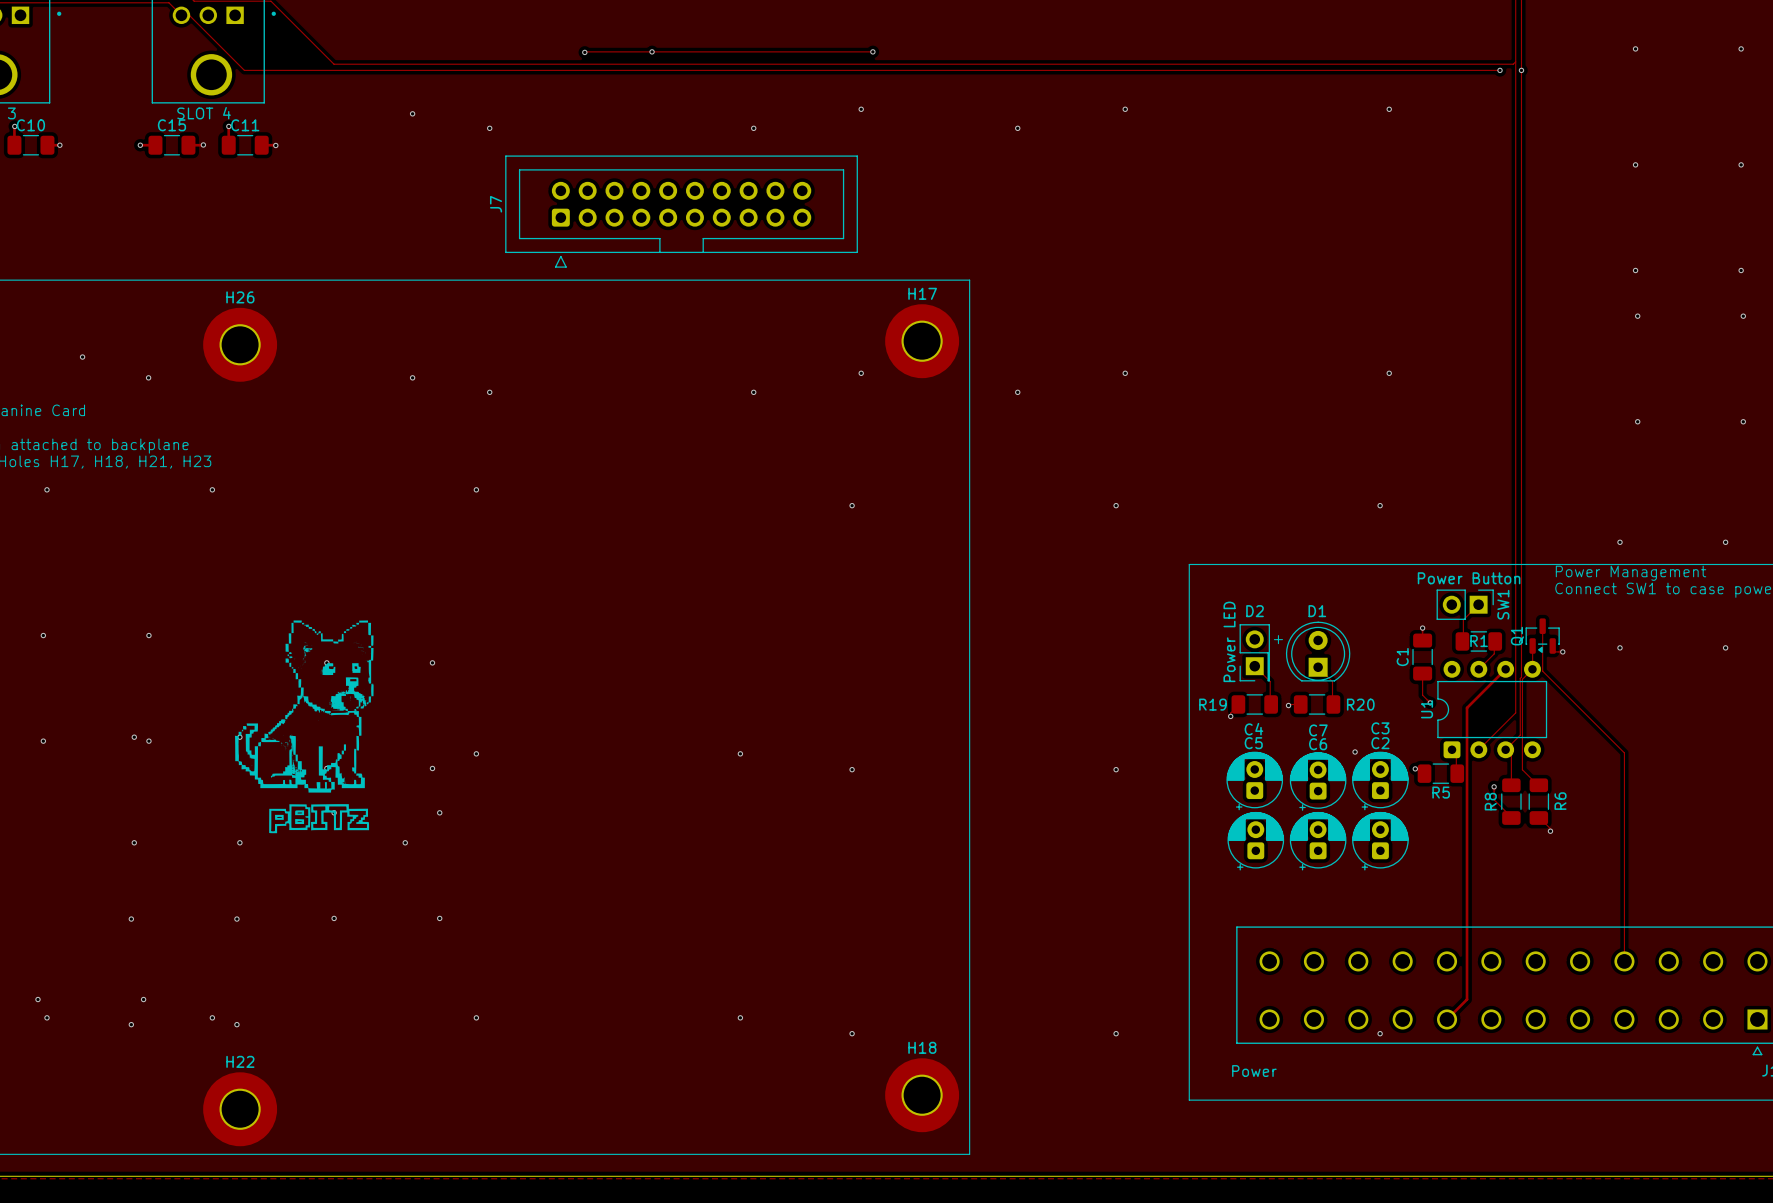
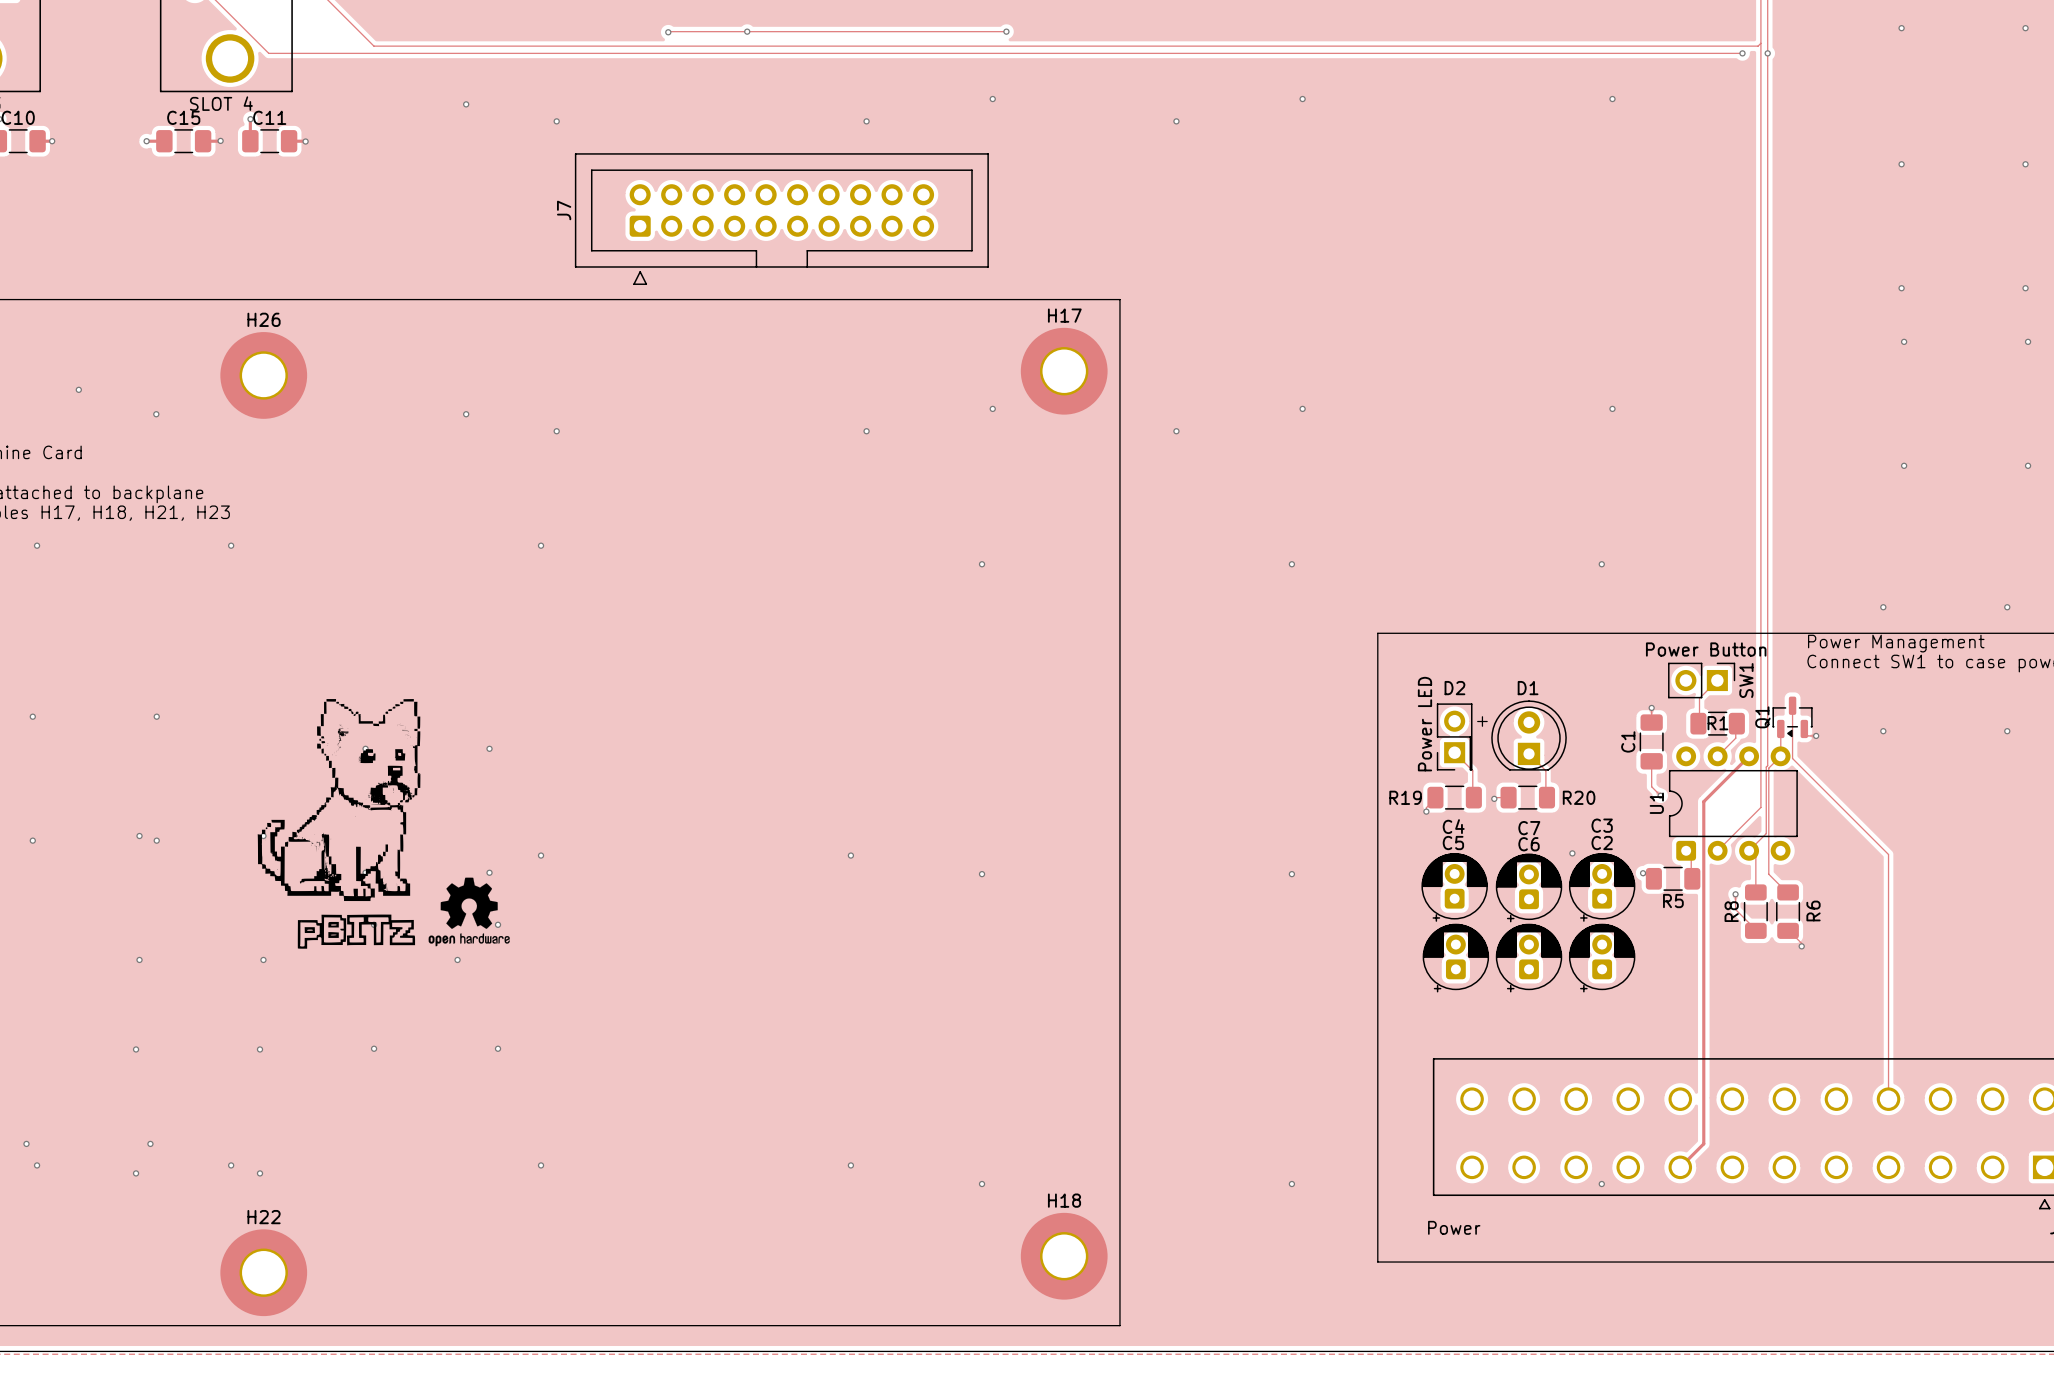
drawing: none -> [428, 877, 510, 947]

